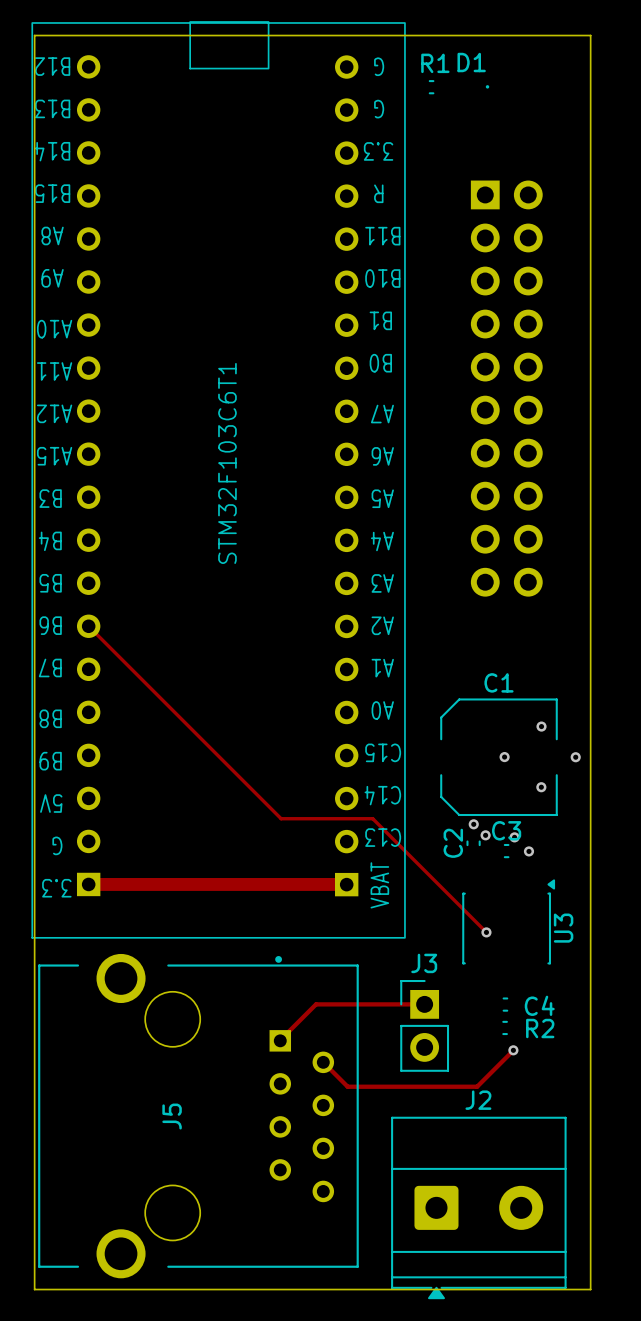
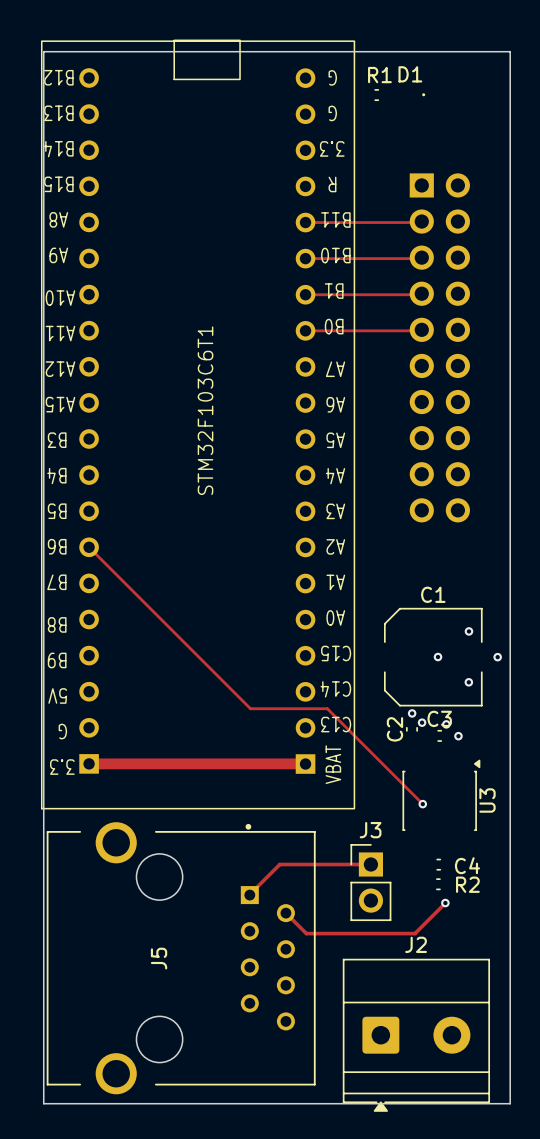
track: none -> (421, 221) (305, 222)
track: none -> (421, 257) (305, 258)
track: none -> (421, 293) (305, 294)
track: none -> (421, 329) (305, 330)

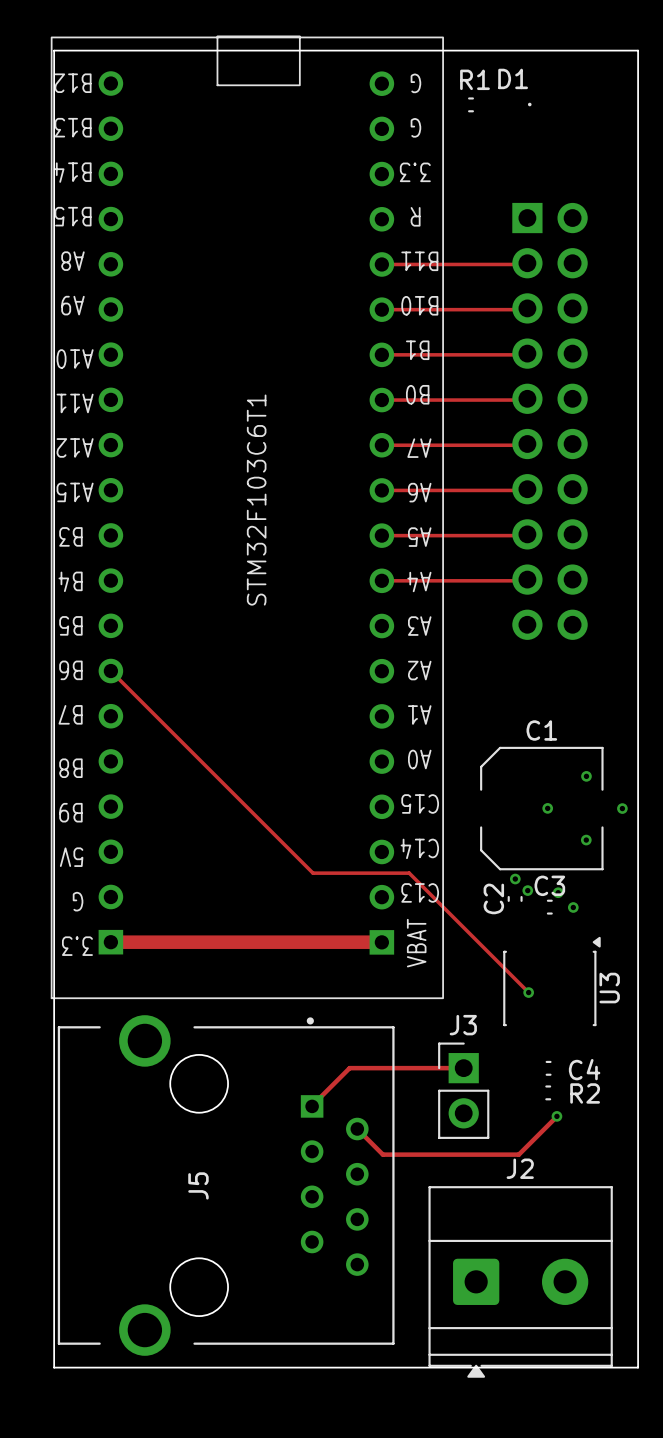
track: none -> (527, 443) (381, 445)
track: none -> (527, 489) (381, 490)
track: none -> (527, 534) (381, 535)
track: none -> (527, 579) (381, 580)

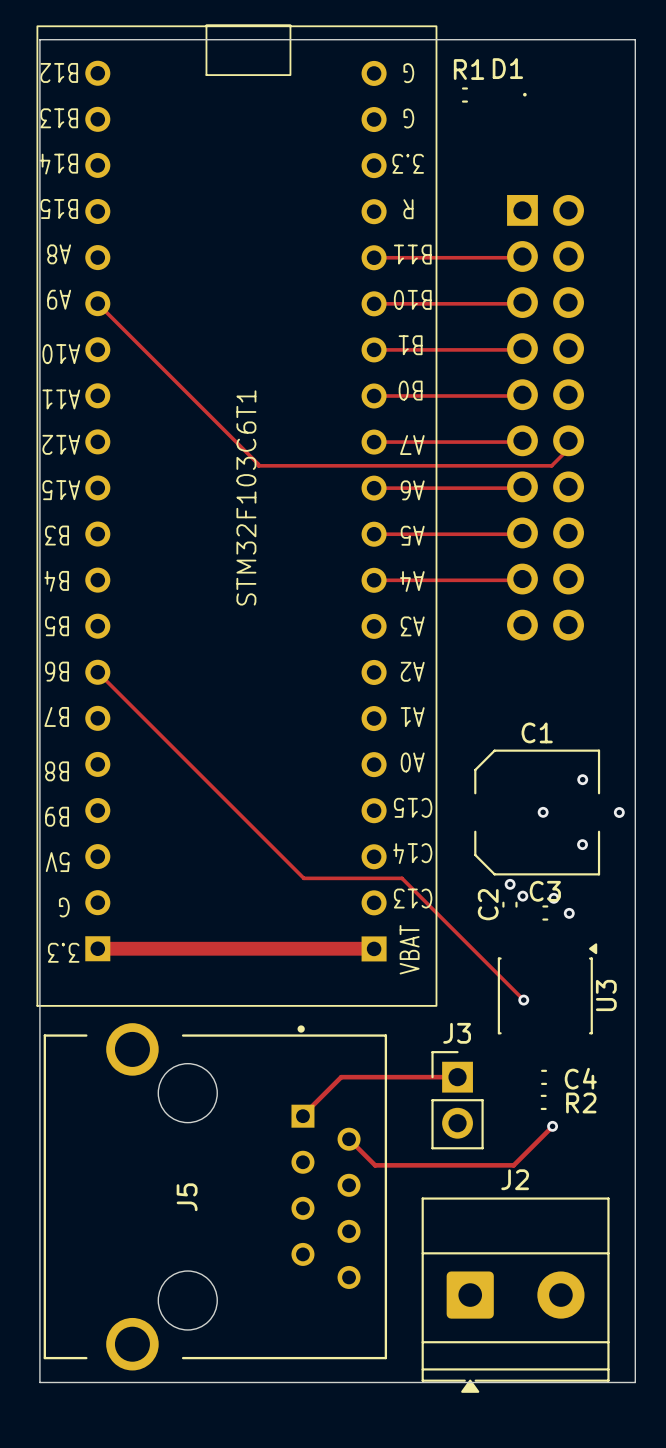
track: none -> (97, 303) (258, 465) (551, 465) (568, 448) (568, 440)

